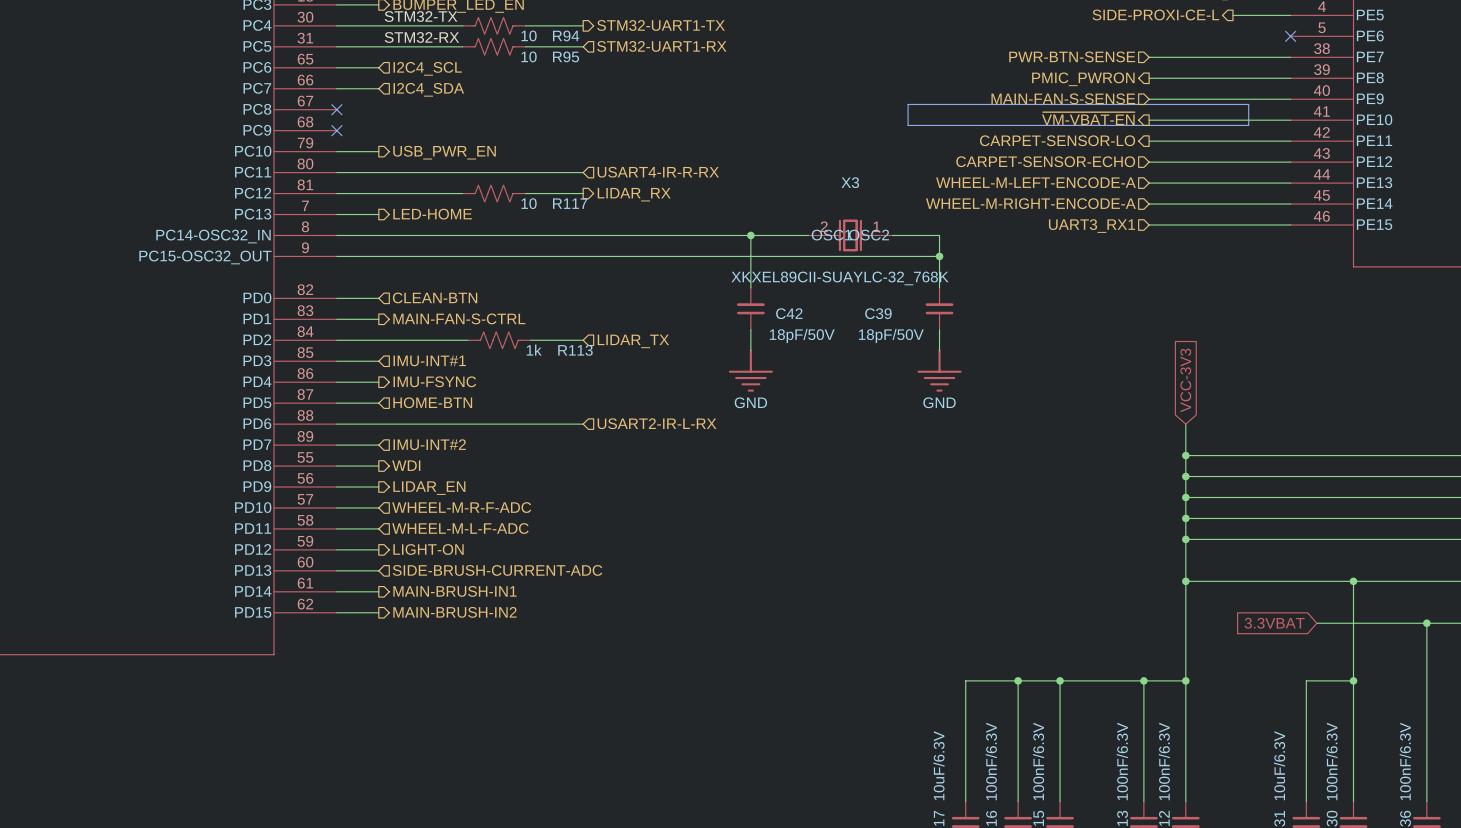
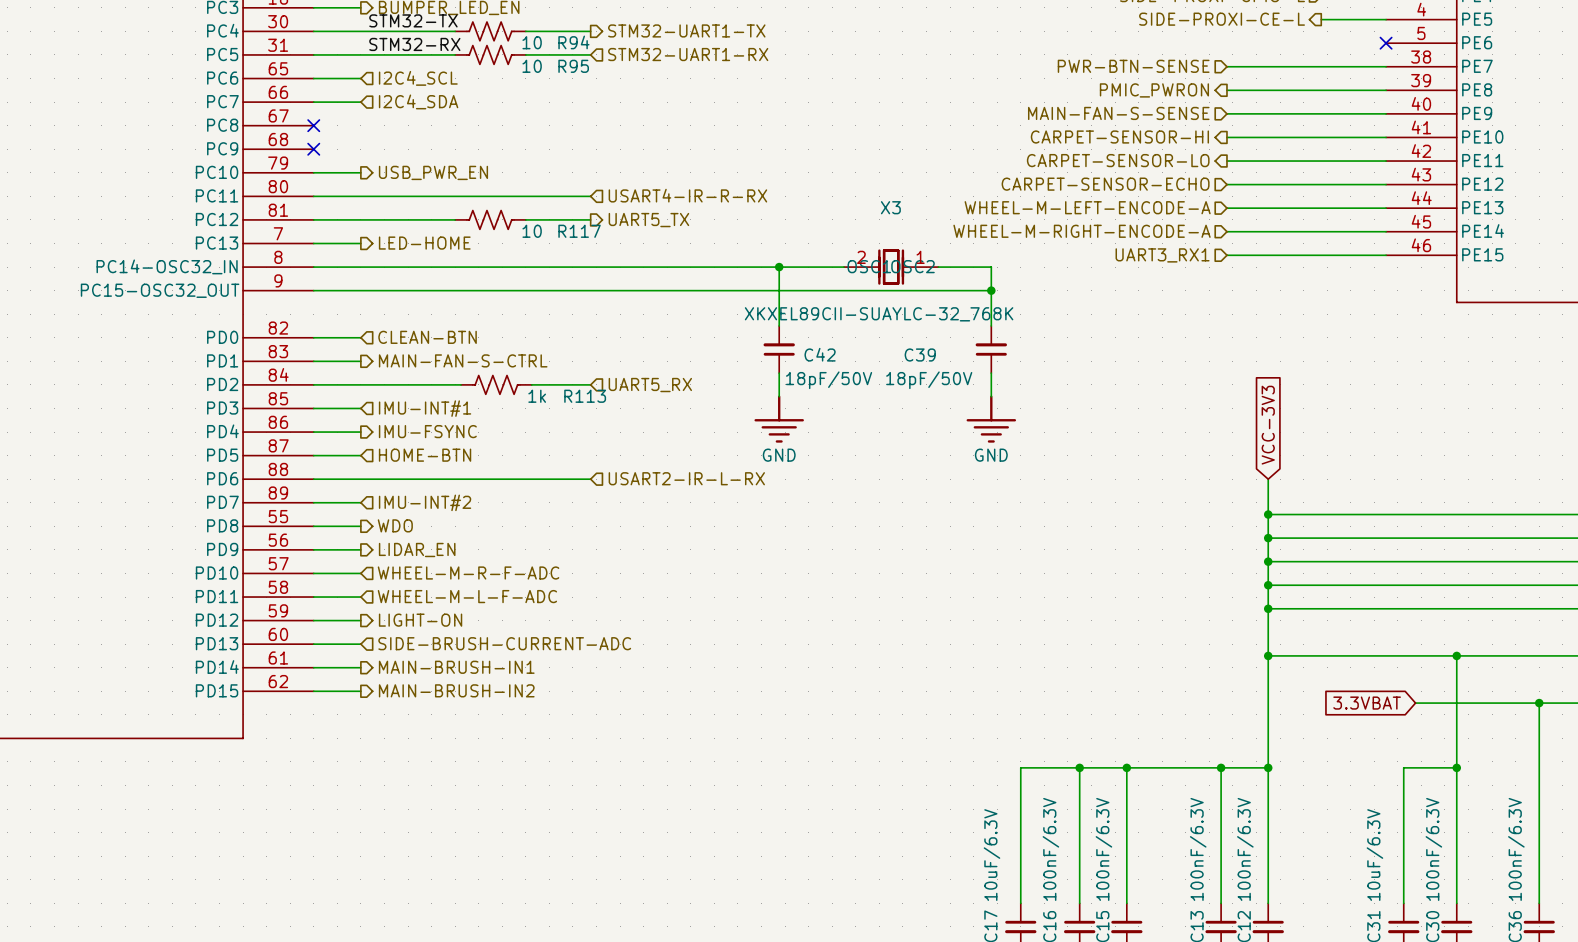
line: (908, 104) (1248, 104) (1248, 125) (908, 125) (908, 104) -> none
hierarchical label: ~{VM-VBAT-EN} (1088, 118) -> CARPET-SENSOR-HI (1119, 137)
hierarchical label: LIDAR_RX (634, 194) -> UART5_TX (648, 220)
hierarchical label: LIDAR_TX (633, 341) -> UART5_RX (650, 385)
hierarchical label: WDI (406, 465) -> WDO (395, 525)

